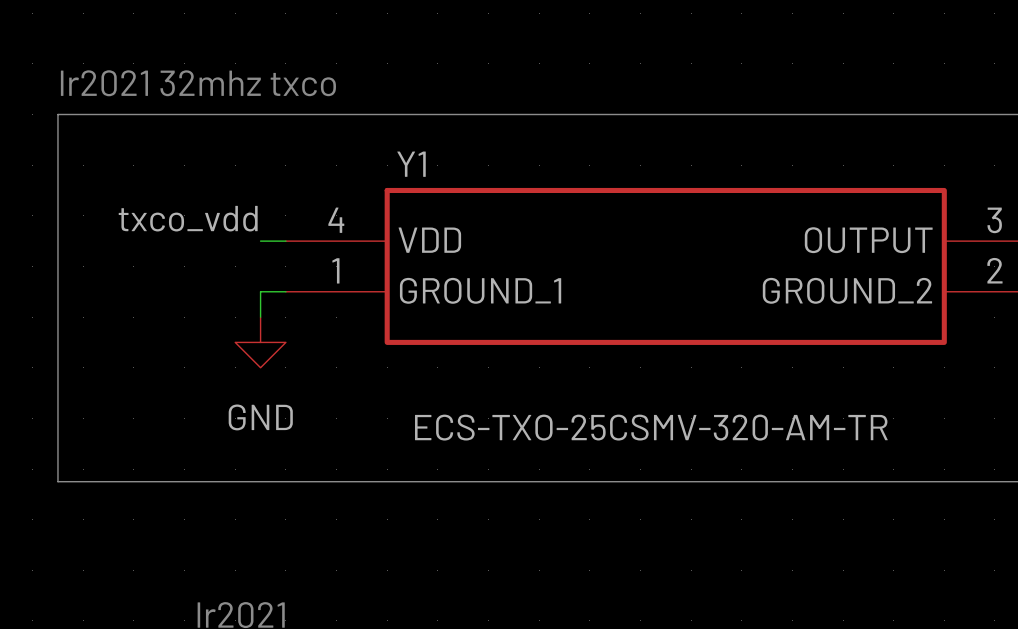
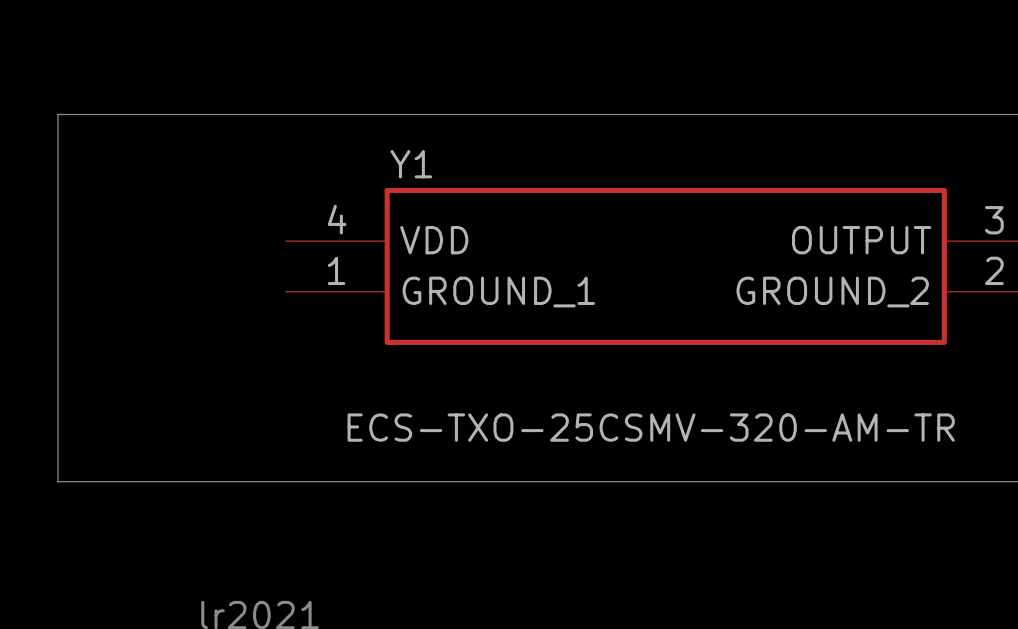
text: lr2021 32mhz txco (198, 83) -> none
label: txco_vdd (188, 218) -> none
wire: (260, 241) (285, 241) -> none
wire: (285, 291) (260, 291) (260, 317) -> none
power symbol: GND (260, 342) -> none

